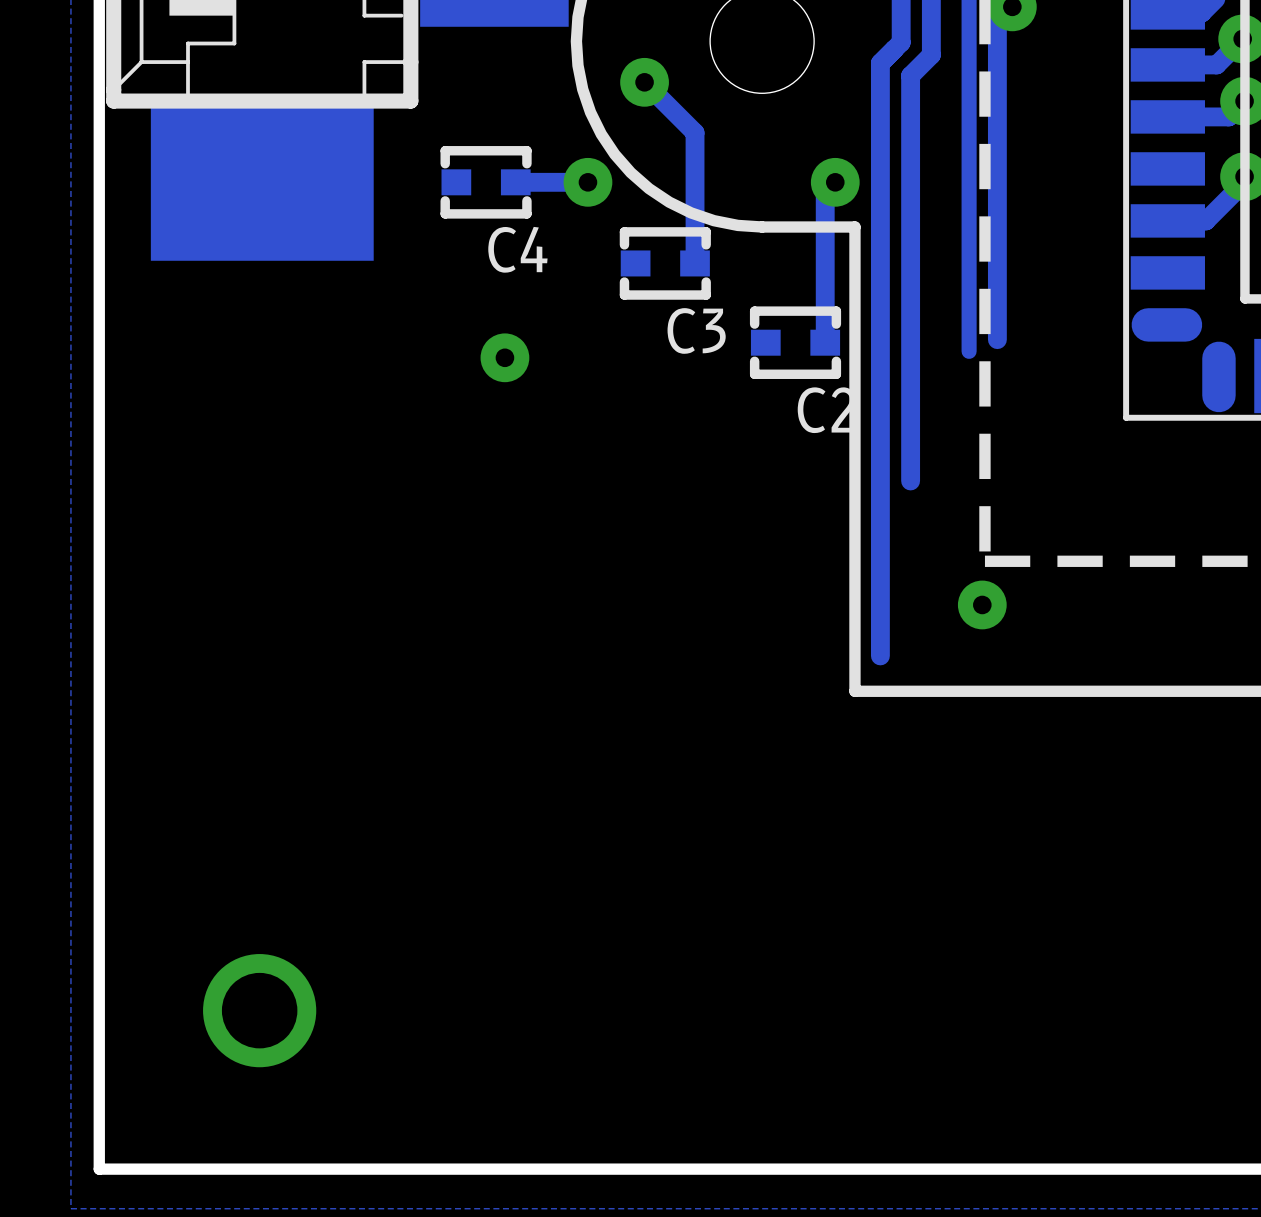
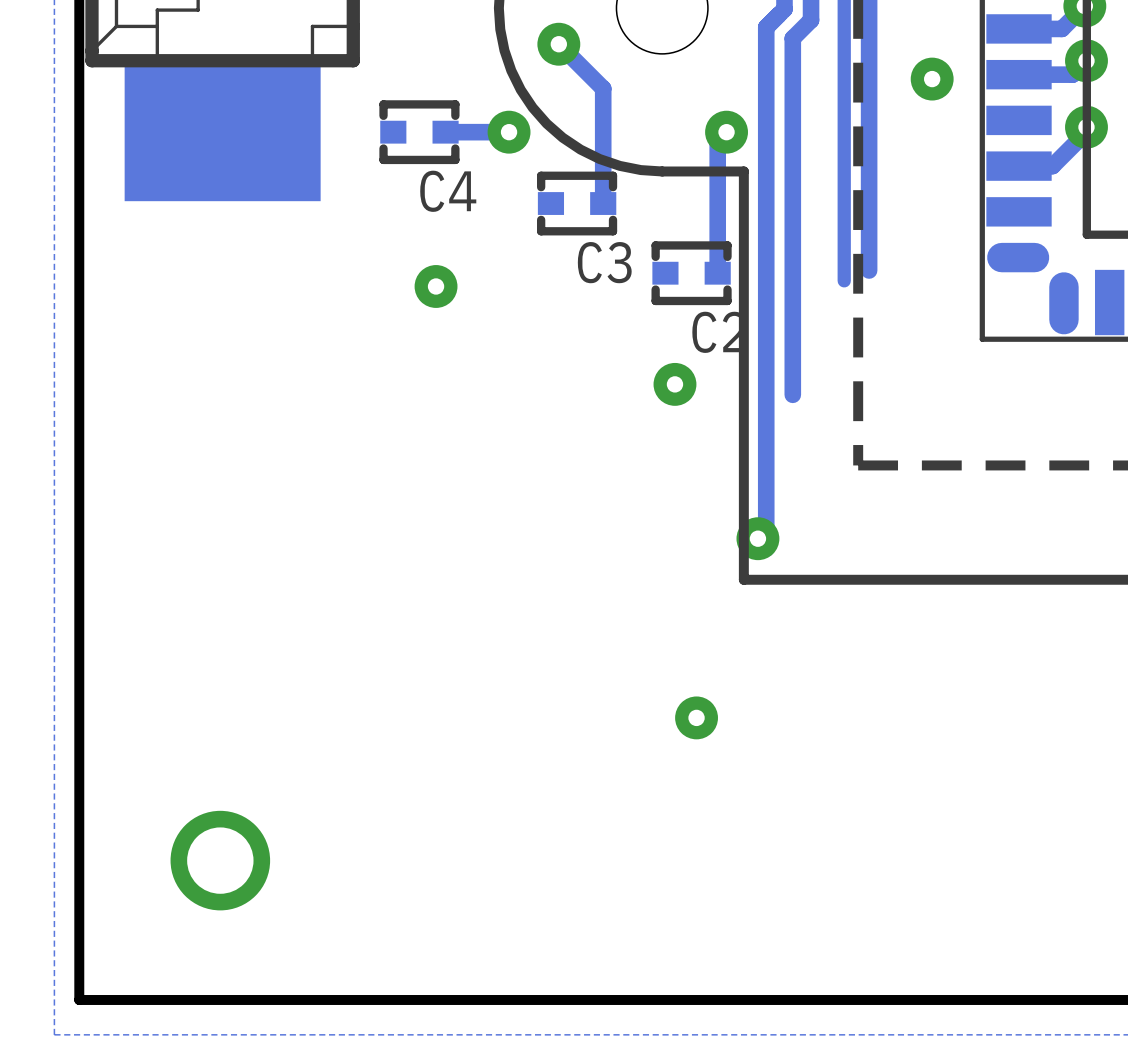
via: none -> (932, 79)
via: none -> (674, 384)
via position: (982, 604) -> (757, 538)
via: none -> (696, 717)

